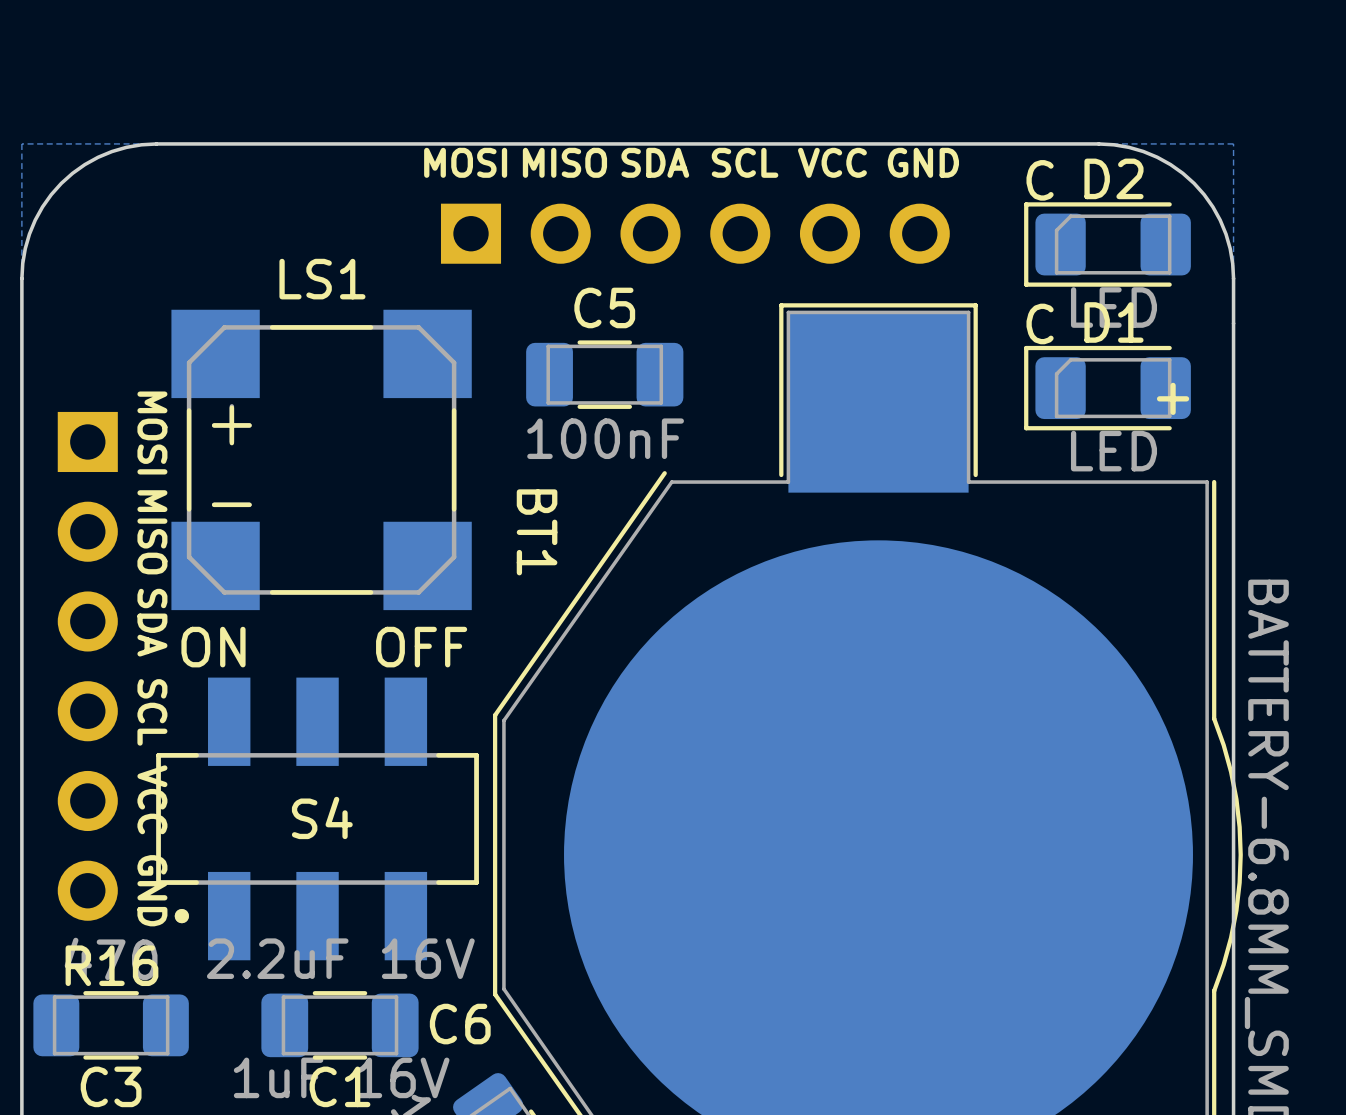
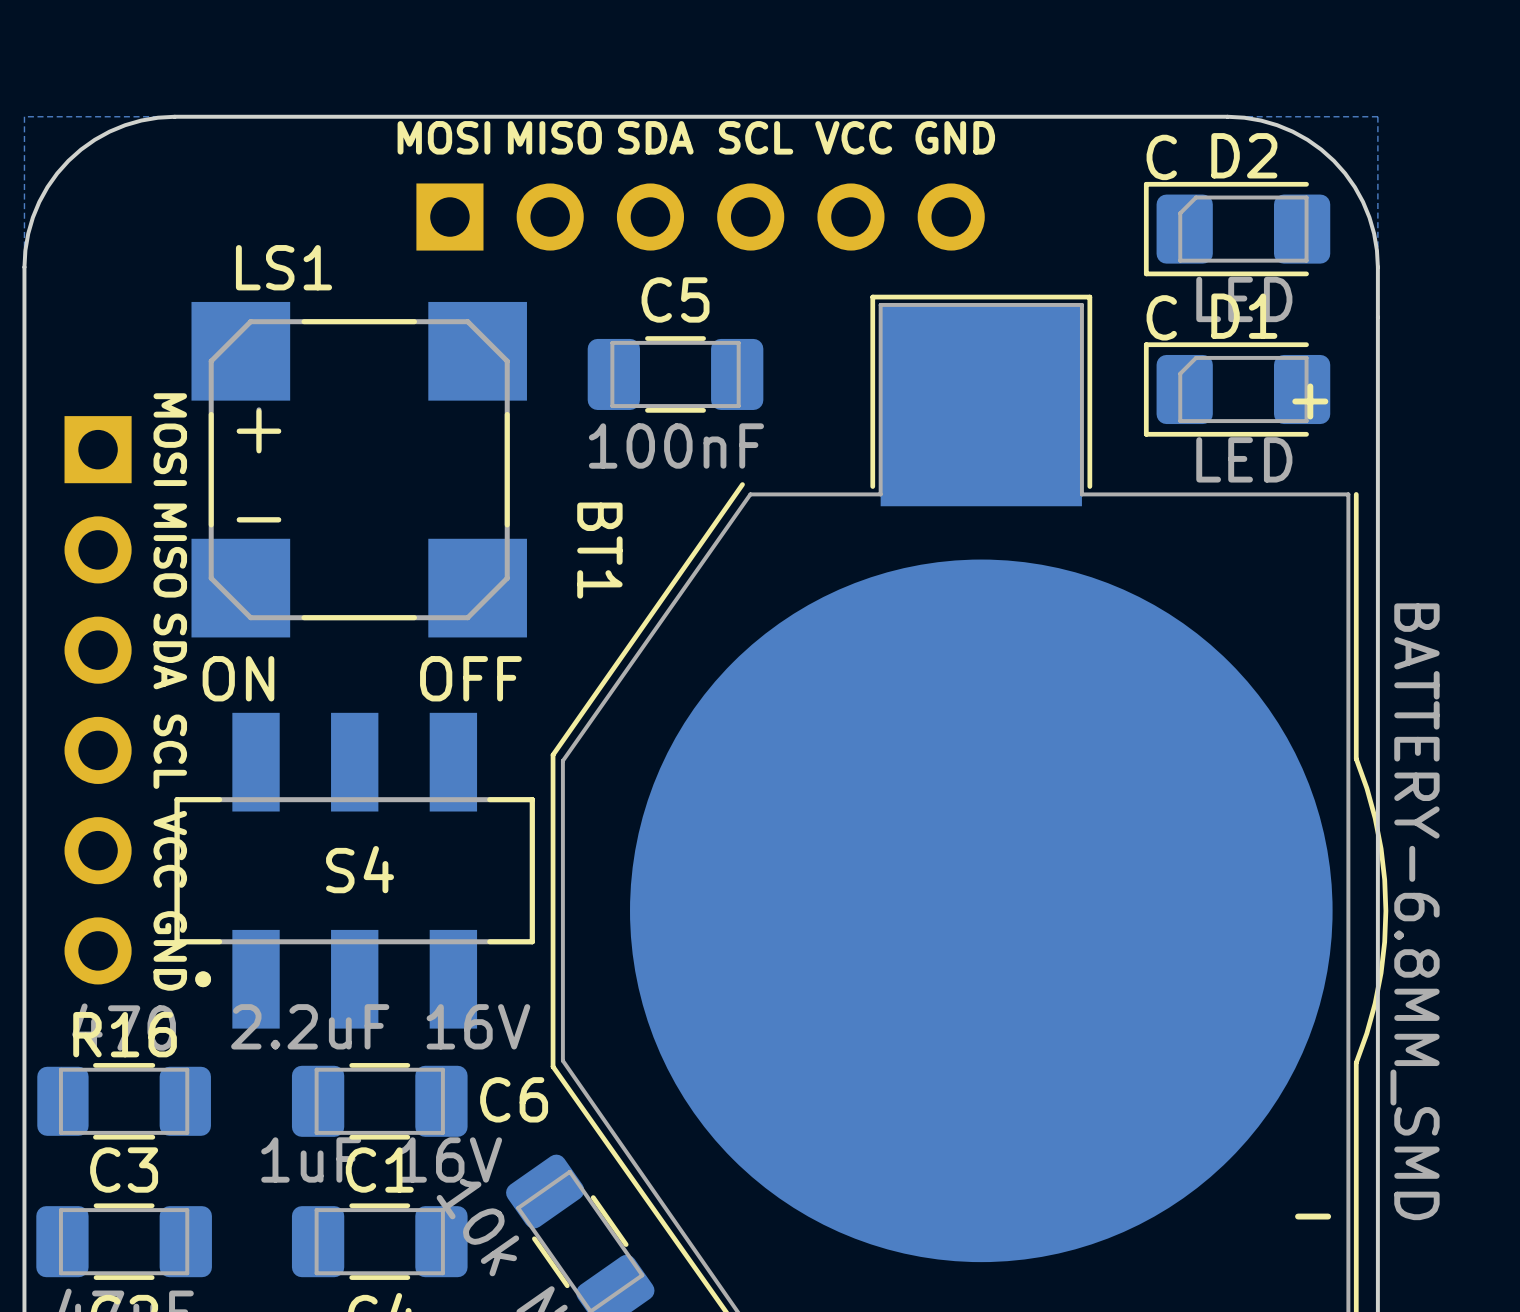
text: none -> MOSI (443, 137)
text: MOSI (465, 162) -> MISO (554, 137)
text: MISO (564, 162) -> SDA (655, 137)
text: SDA (655, 162) -> SCL (756, 137)
text: SCL (745, 162) -> VCC (853, 137)
text: VCC (832, 162) -> GND (955, 137)
text: GND (923, 162) -> none
part position: (695, 233) -> (700, 217)
LS1 name position: LS1 (322, 279) -> LS1 (283, 267)

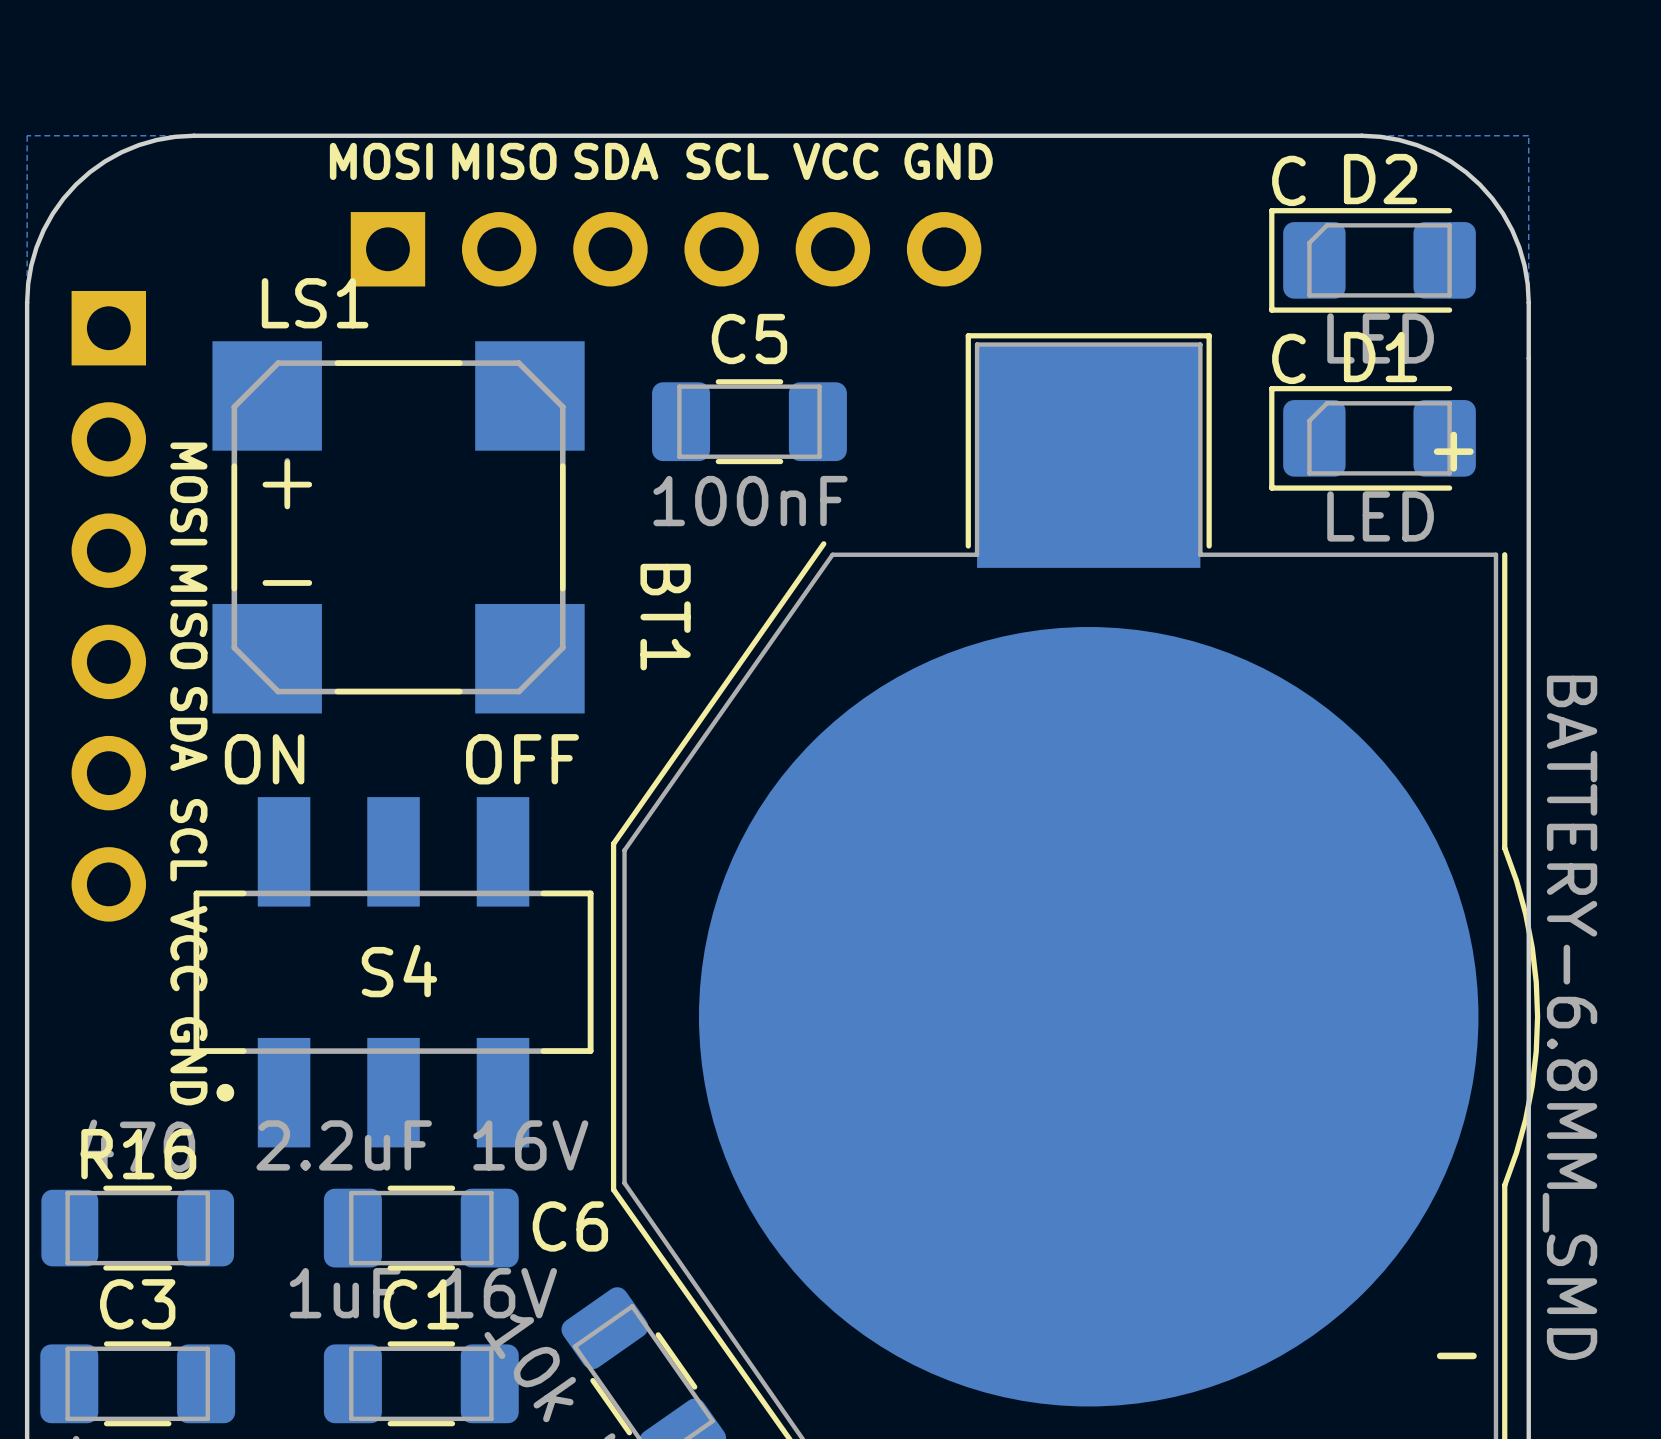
text: MOSI (443, 137) -> MISO (504, 161)
text: MISO (554, 137) -> SDA (616, 161)
text: SDA (655, 137) -> SCL (727, 161)
text: SCL (756, 137) -> VCC (835, 161)
text: VCC (853, 137) -> GND (948, 161)
text: GND (955, 137) -> none
text: none -> MOSI (381, 161)
part position: (700, 217) -> (666, 249)
part position: (98, 700) -> (108, 606)

